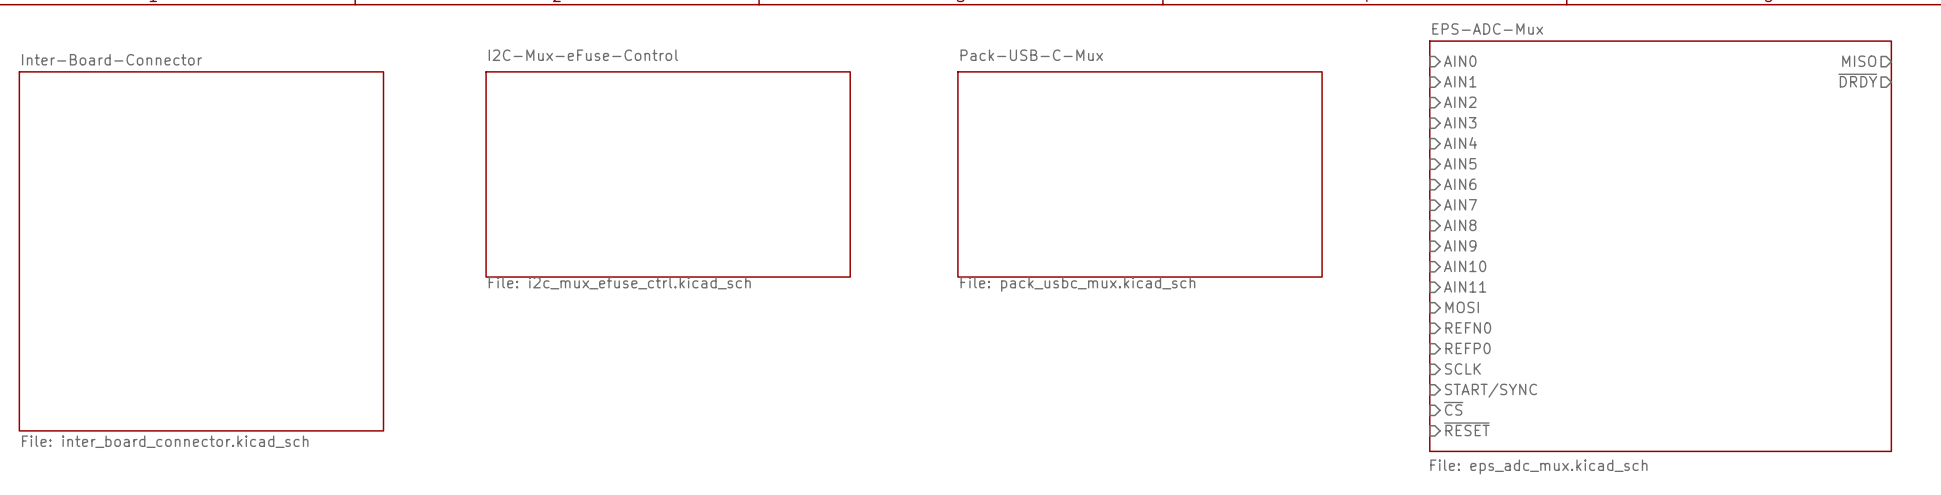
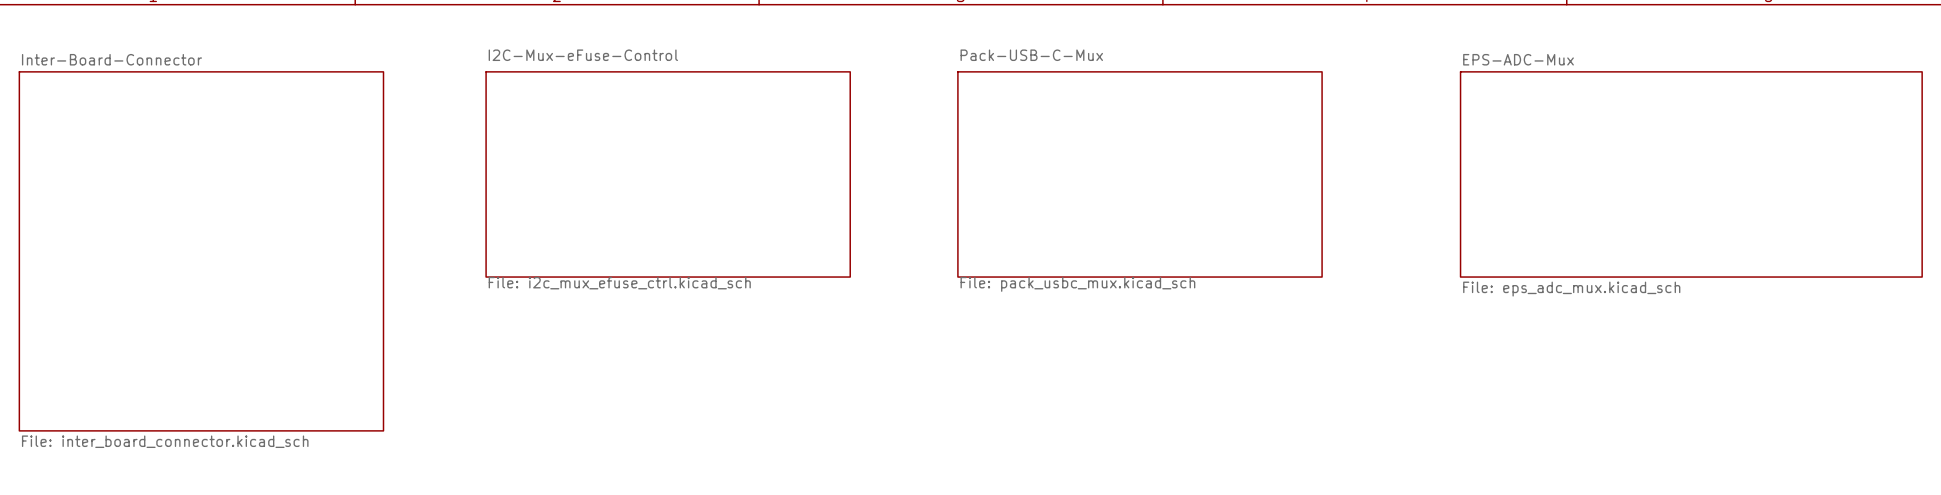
sheet pin: AIN0 (1460, 61) -> none
sheet pin: MISO (1859, 61) -> none
sheet pin: ~{DRDY} (1857, 80) -> none
sheet pin: AIN1 (1460, 81) -> none
sheet pin: AIN2 (1460, 102) -> none
sheet pin: AIN3 (1460, 122) -> none
sheet pin: AIN4 (1460, 143) -> none
sheet pin: AIN5 (1460, 163) -> none
sheet EPS-ADC-Mux: none -> File: eps_adc_mux.kicad_sch (1691, 174)
sheet pin: AIN6 (1460, 184) -> none
sheet pin: AIN7 (1460, 204) -> none
sheet pin: AIN8 (1460, 225) -> none
sheet pin: AIN9 (1460, 245) -> none
sheet EPS-ADC-Mux: File: eps_adc_mux.kicad_sch (1660, 246) -> none
sheet pin: AIN10 (1465, 266) -> none
sheet pin: AIN11 (1465, 286) -> none
sheet pin: MOSI (1462, 307) -> none
sheet pin: REFN0 (1468, 327) -> none
sheet pin: REFP0 (1468, 348) -> none
sheet pin: SCLK (1462, 368) -> none
sheet pin: START/SYNC (1490, 390) -> none
sheet pin: ~{CS} (1453, 408) -> none
sheet pin: ~{RESET} (1466, 429) -> none

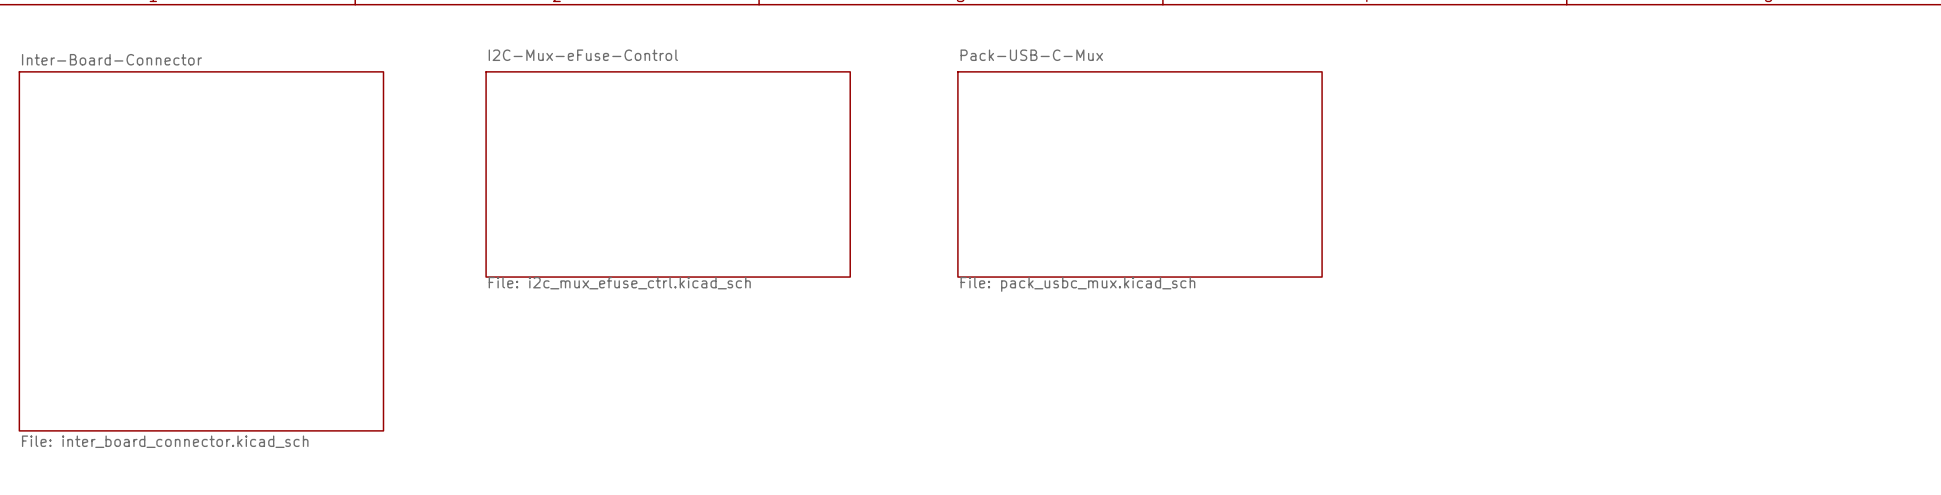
sheet EPS-ADC-Mux: File: eps_adc_mux.kicad_sch (1691, 174) -> none

